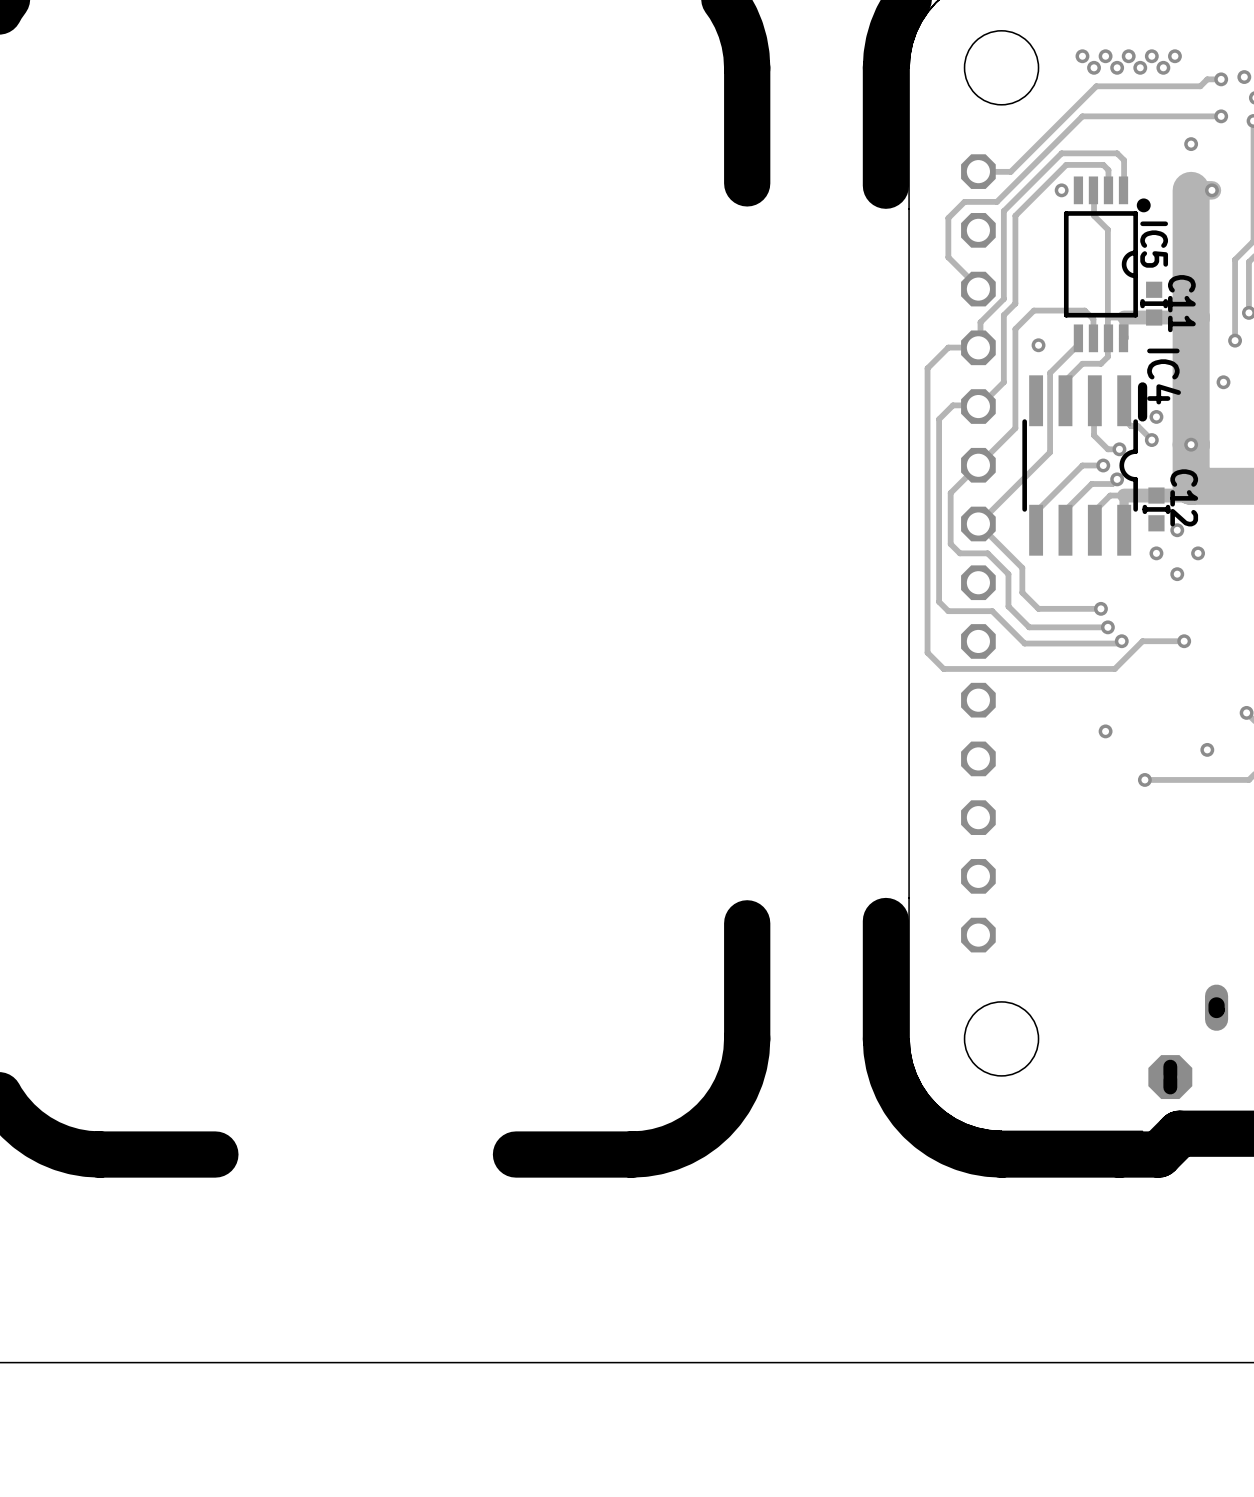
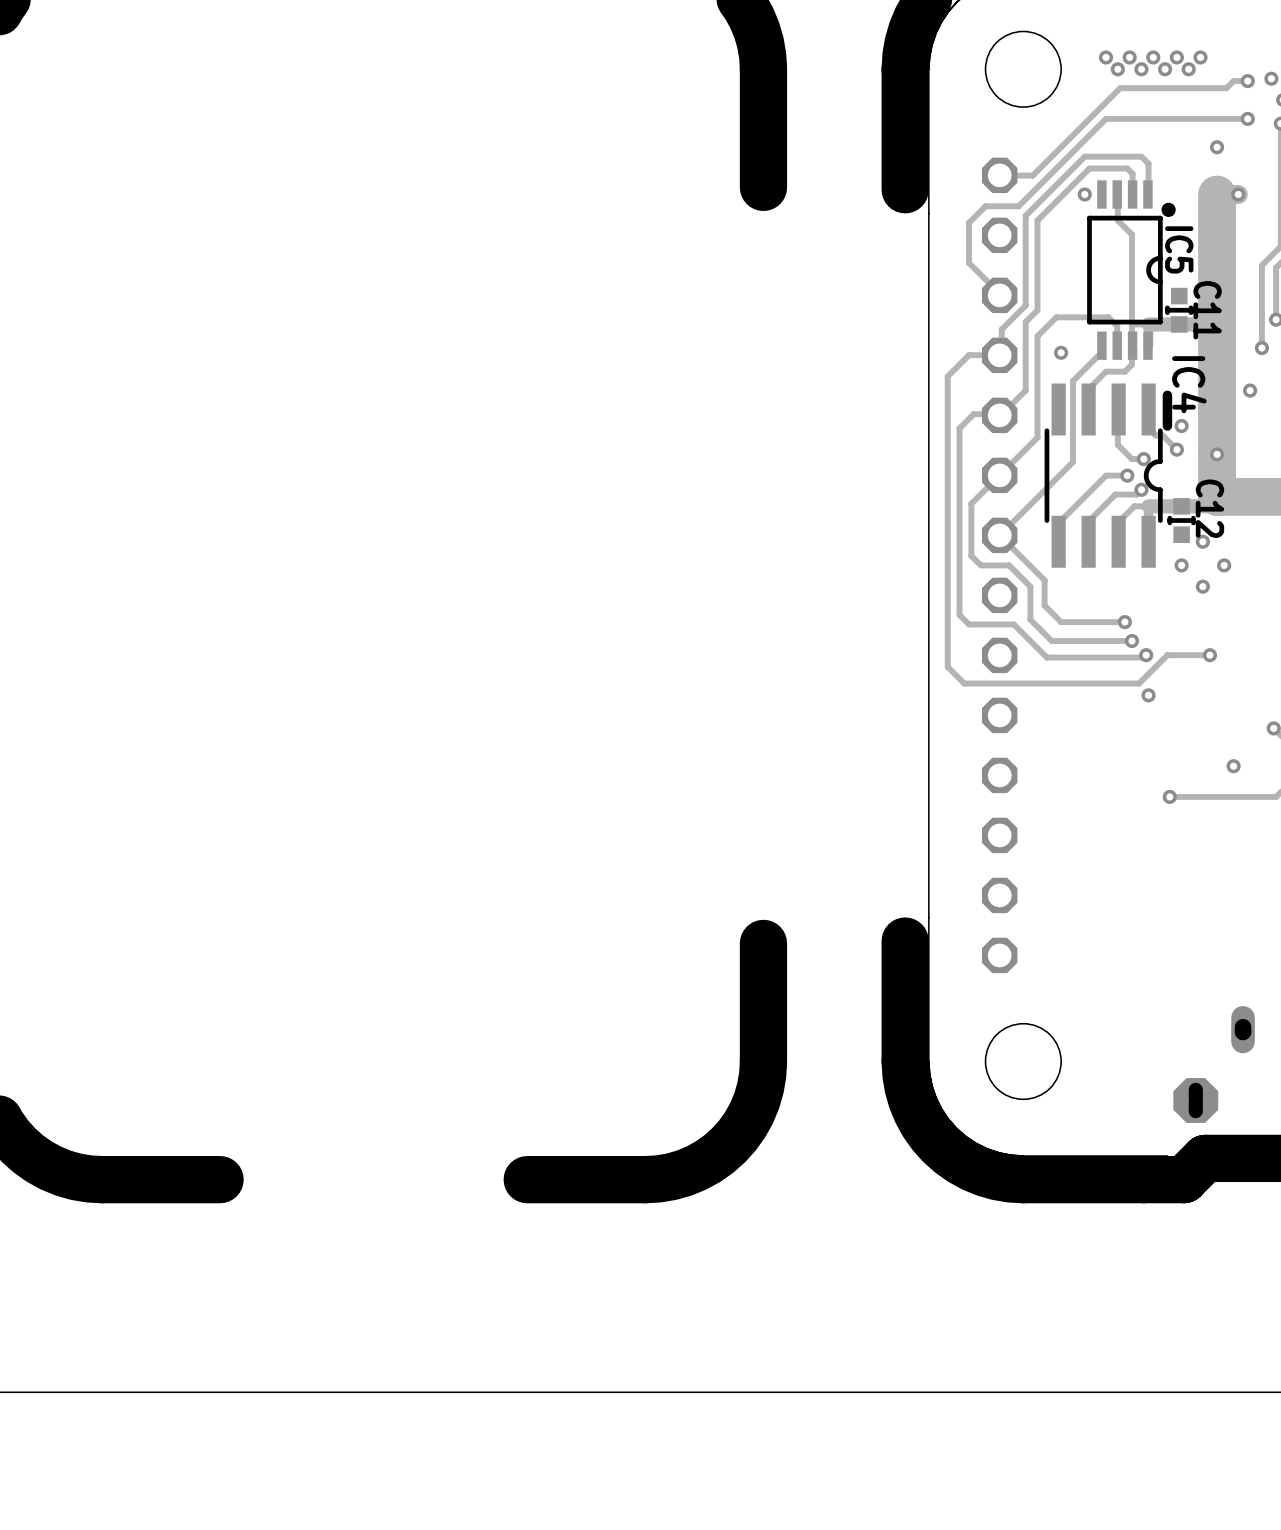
via position: (1105, 731) -> (1148, 695)

